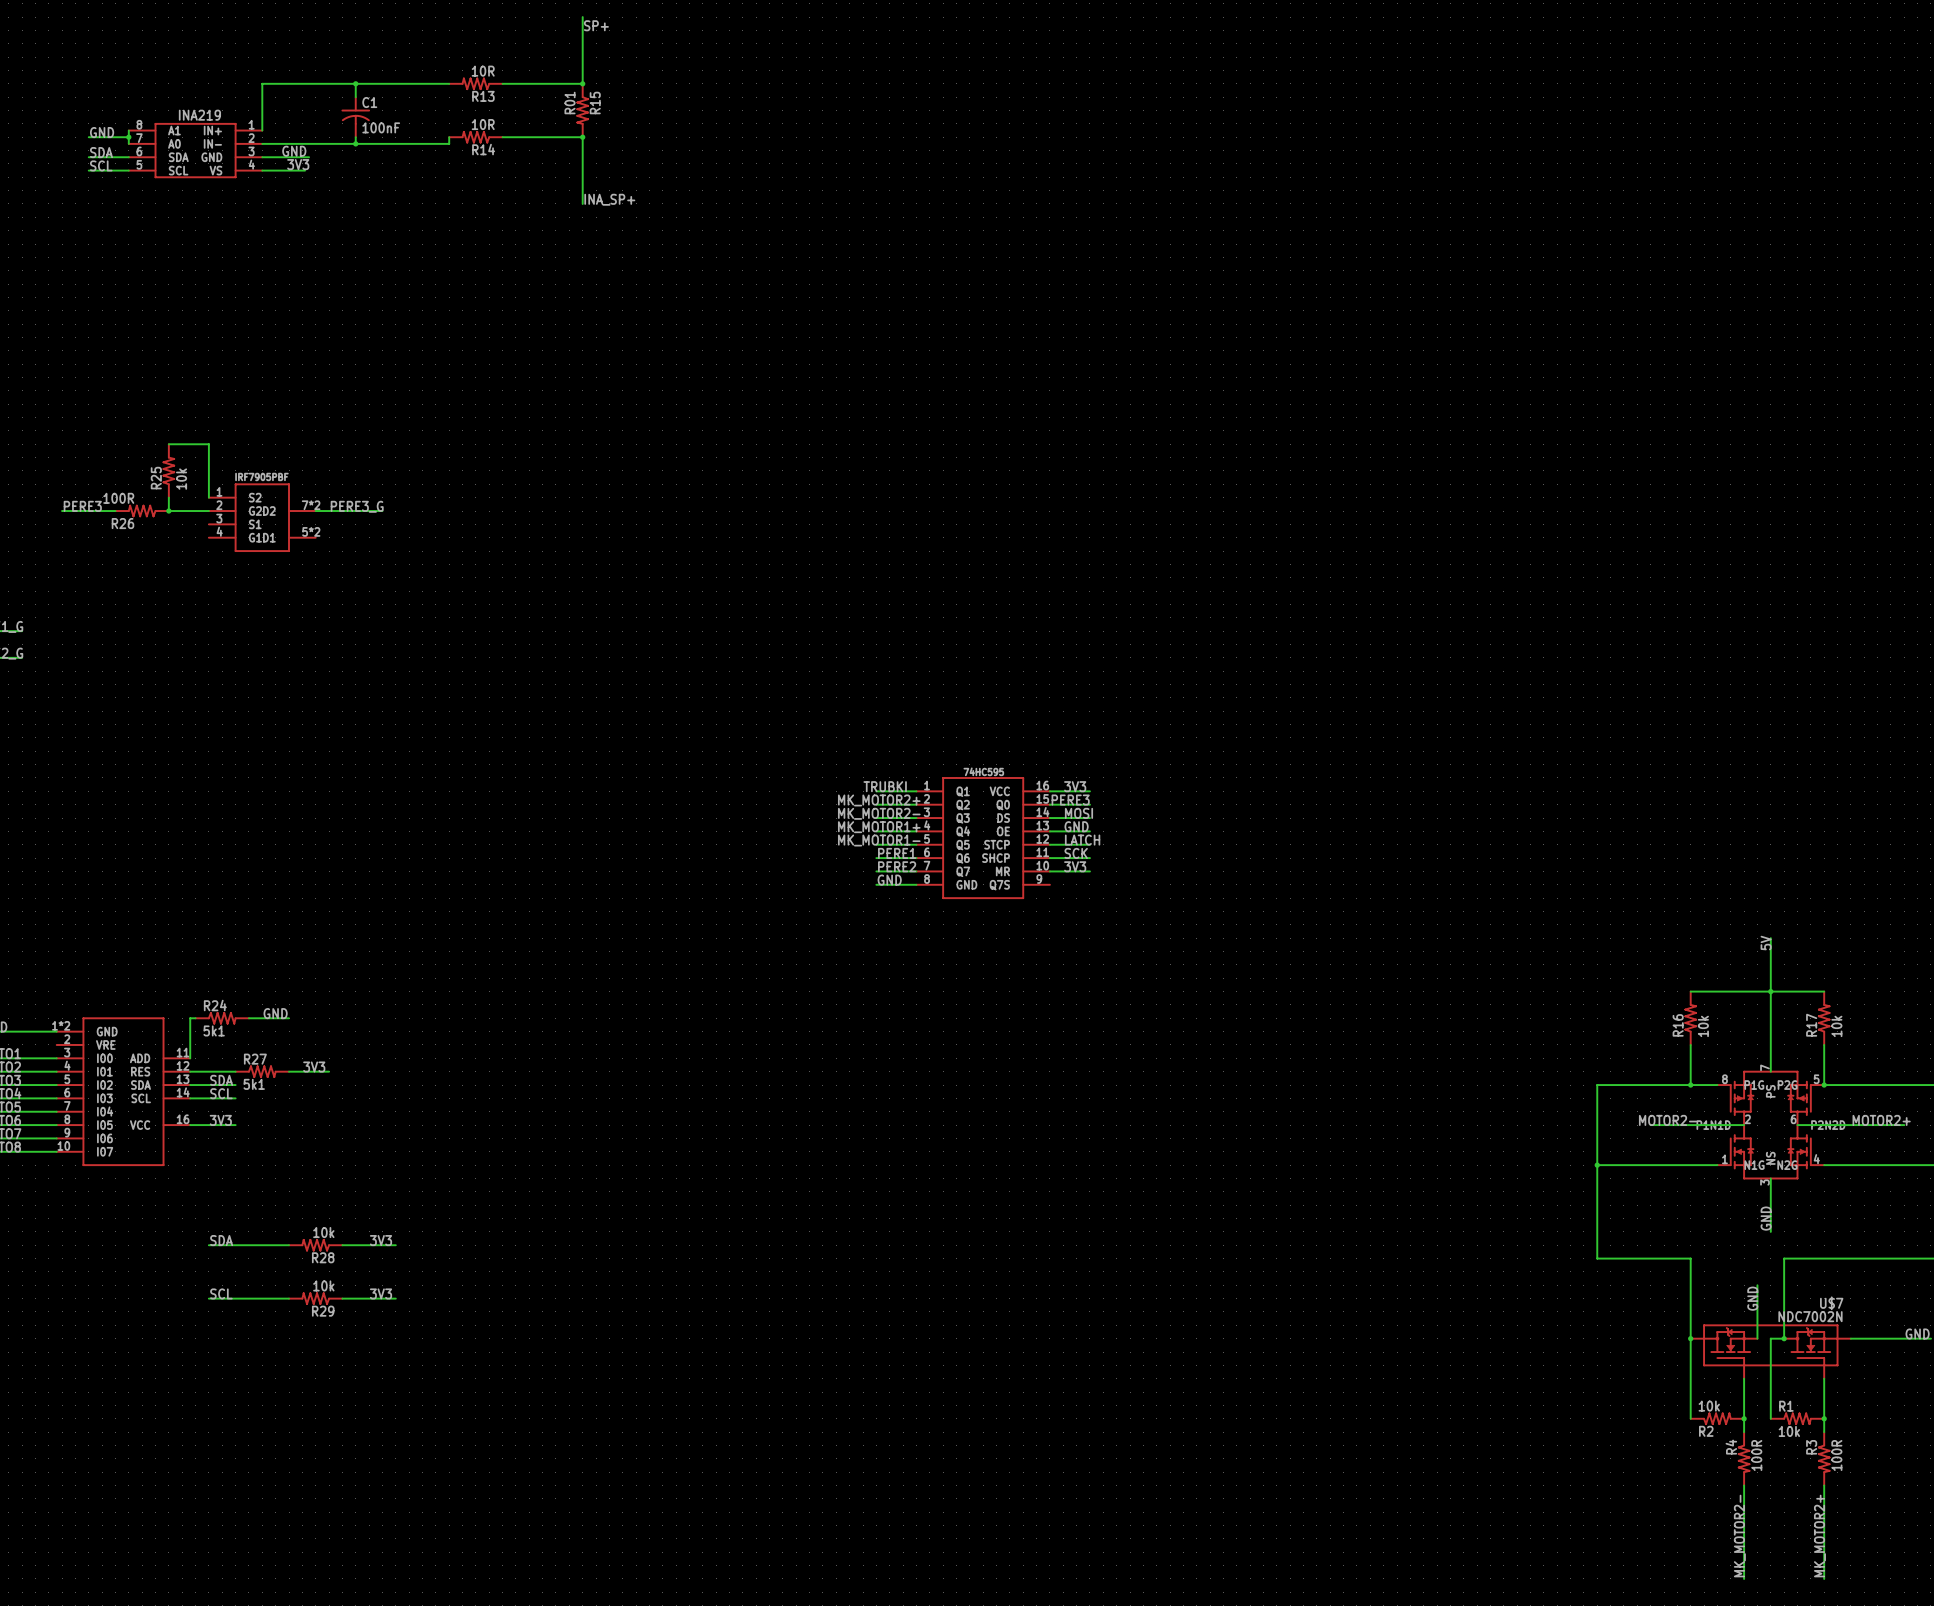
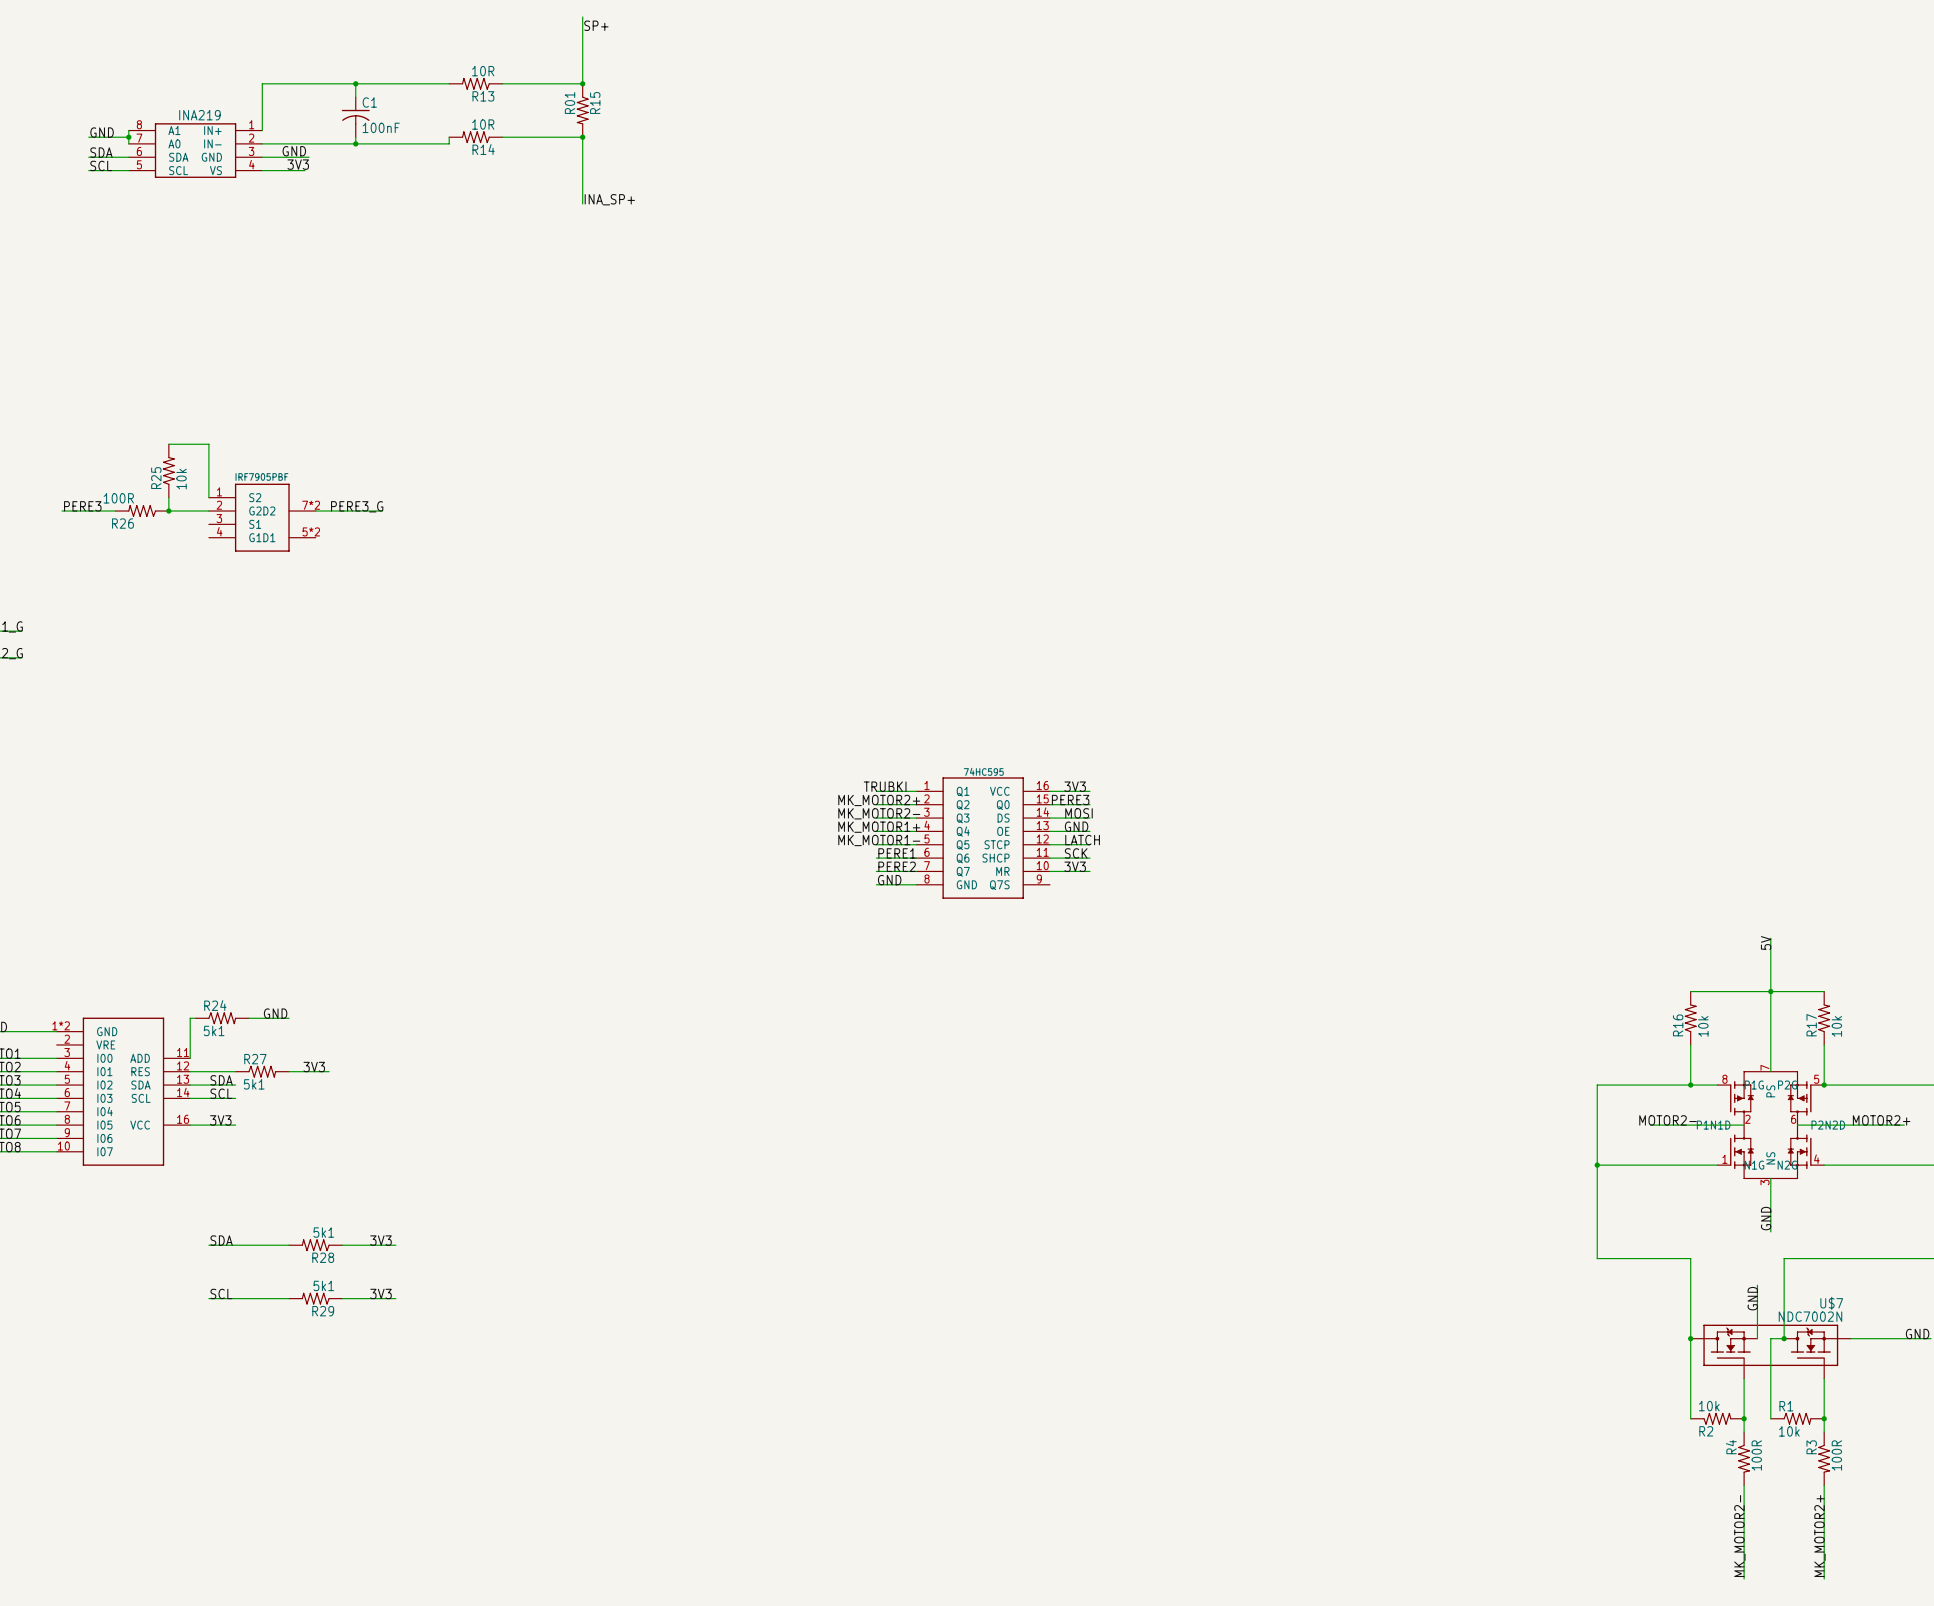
R28 value: 10k (323, 1232) -> 5k1 (323, 1232)
R29 value: 10k (323, 1285) -> 5k1 (323, 1285)

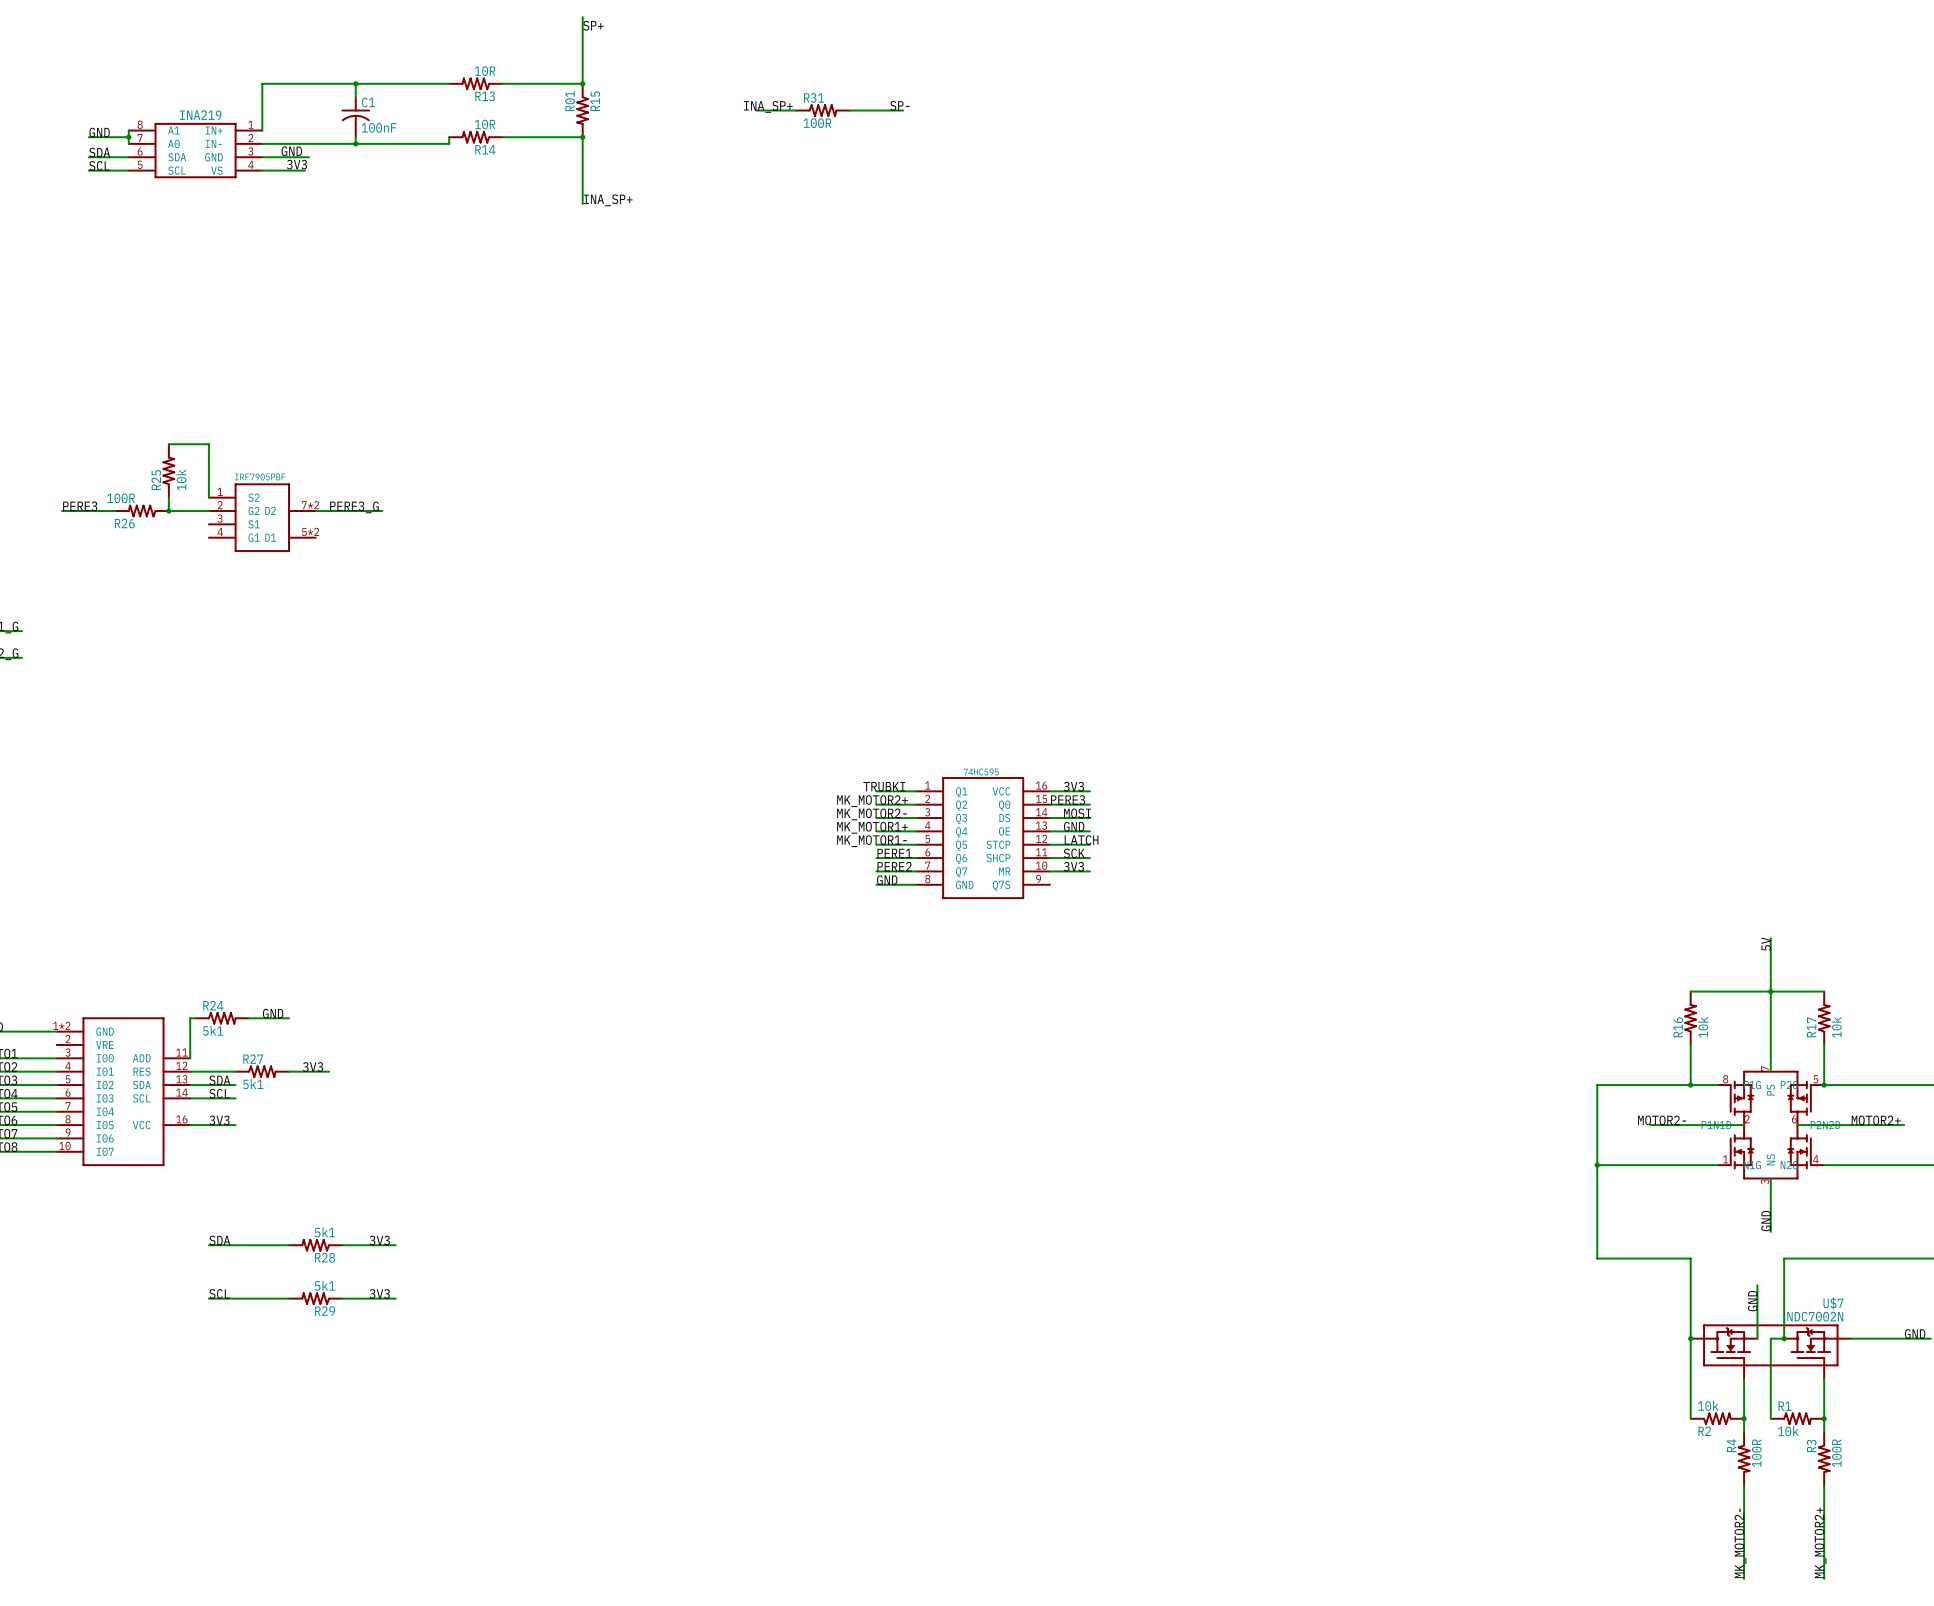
label: none -> SP- (899, 105)
label: none -> INA_SP+ (768, 106)
wire: none -> (756, 110) (796, 110)
R31: none -> 100R (822, 110)
wire: none -> (849, 110) (903, 110)

